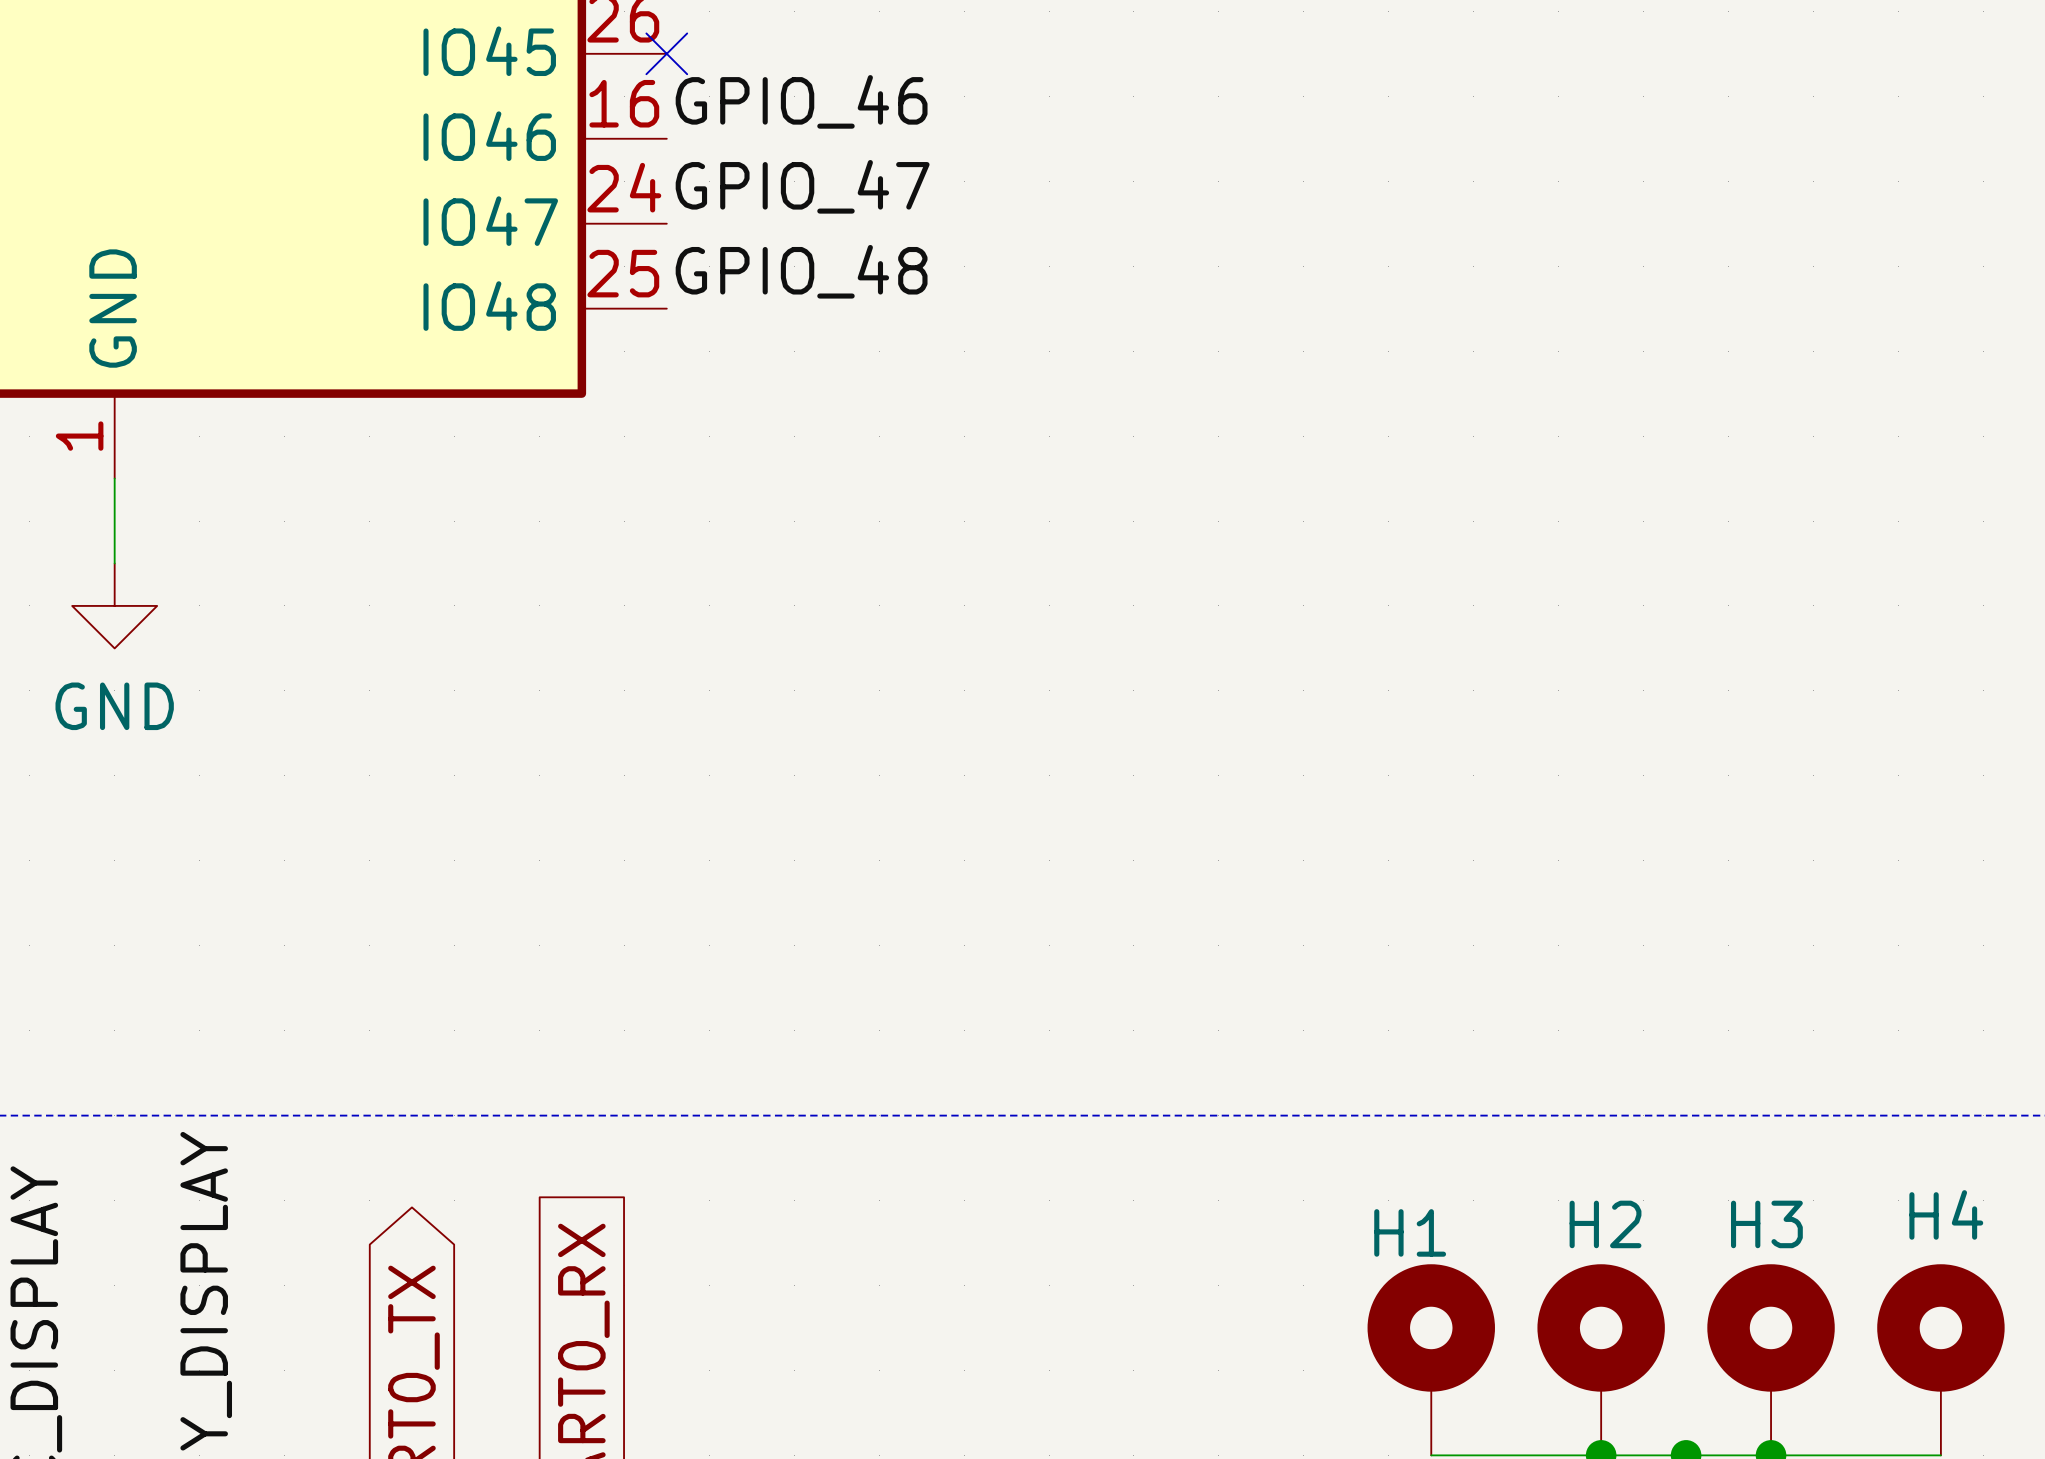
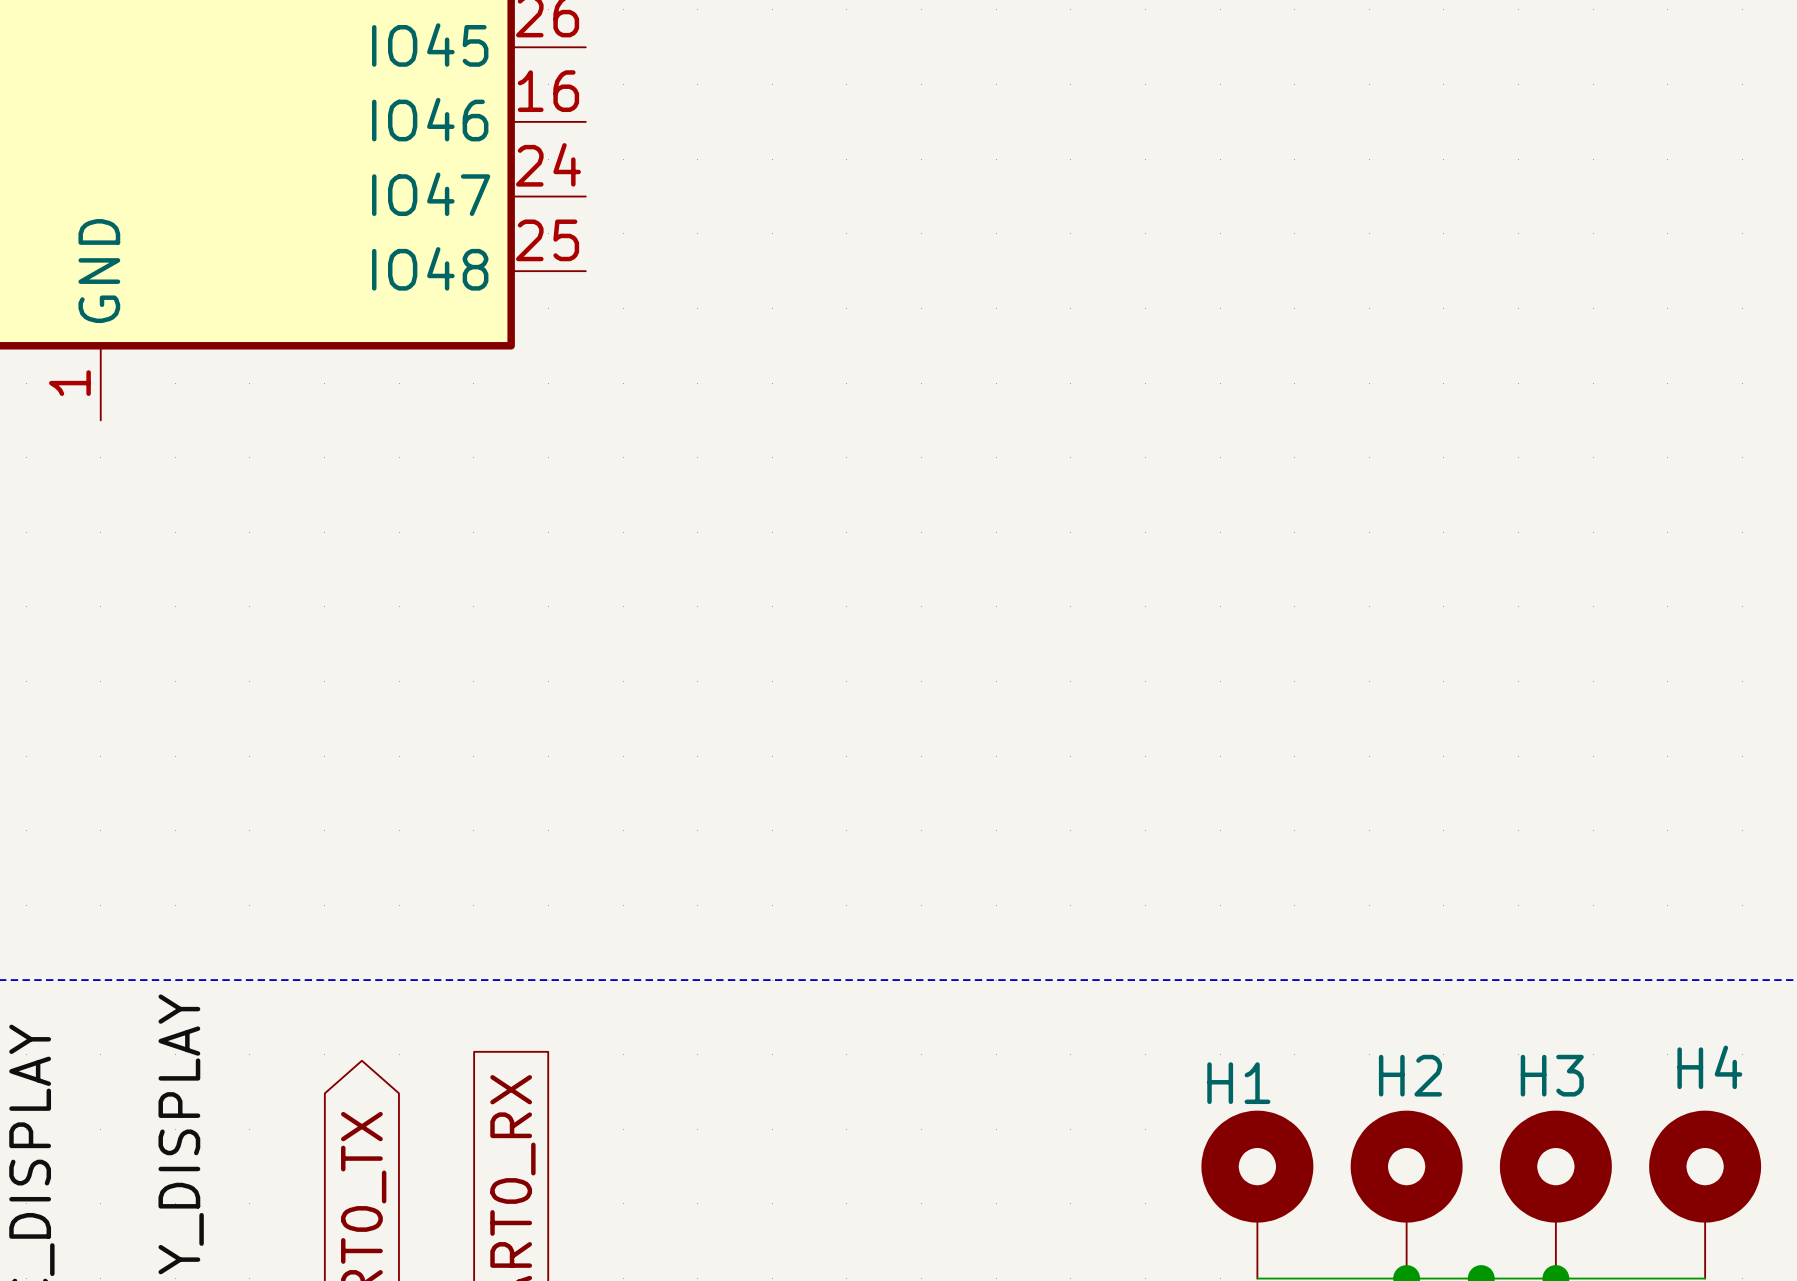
no-connect mark: (666, 53) -> none
label: GPIO_46 (801, 101) -> none
label: GPIO_47 (802, 186) -> none
label: GPIO_48 (801, 271) -> none
wire: (114, 478) (114, 563) -> none
power symbol: GND (114, 605) -> none

